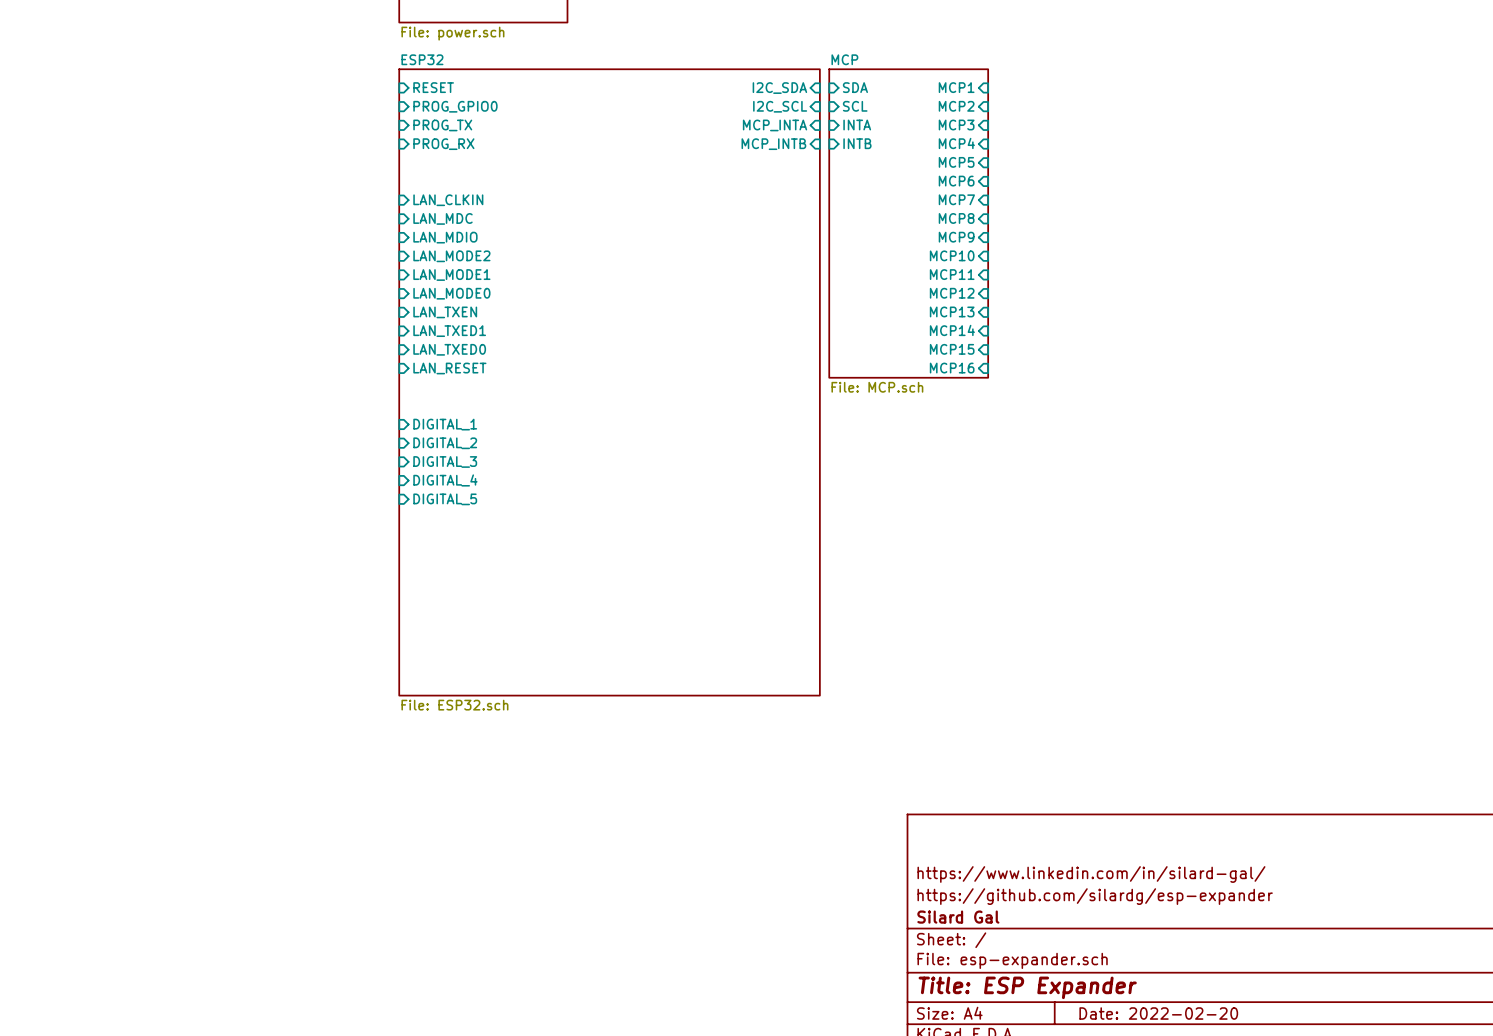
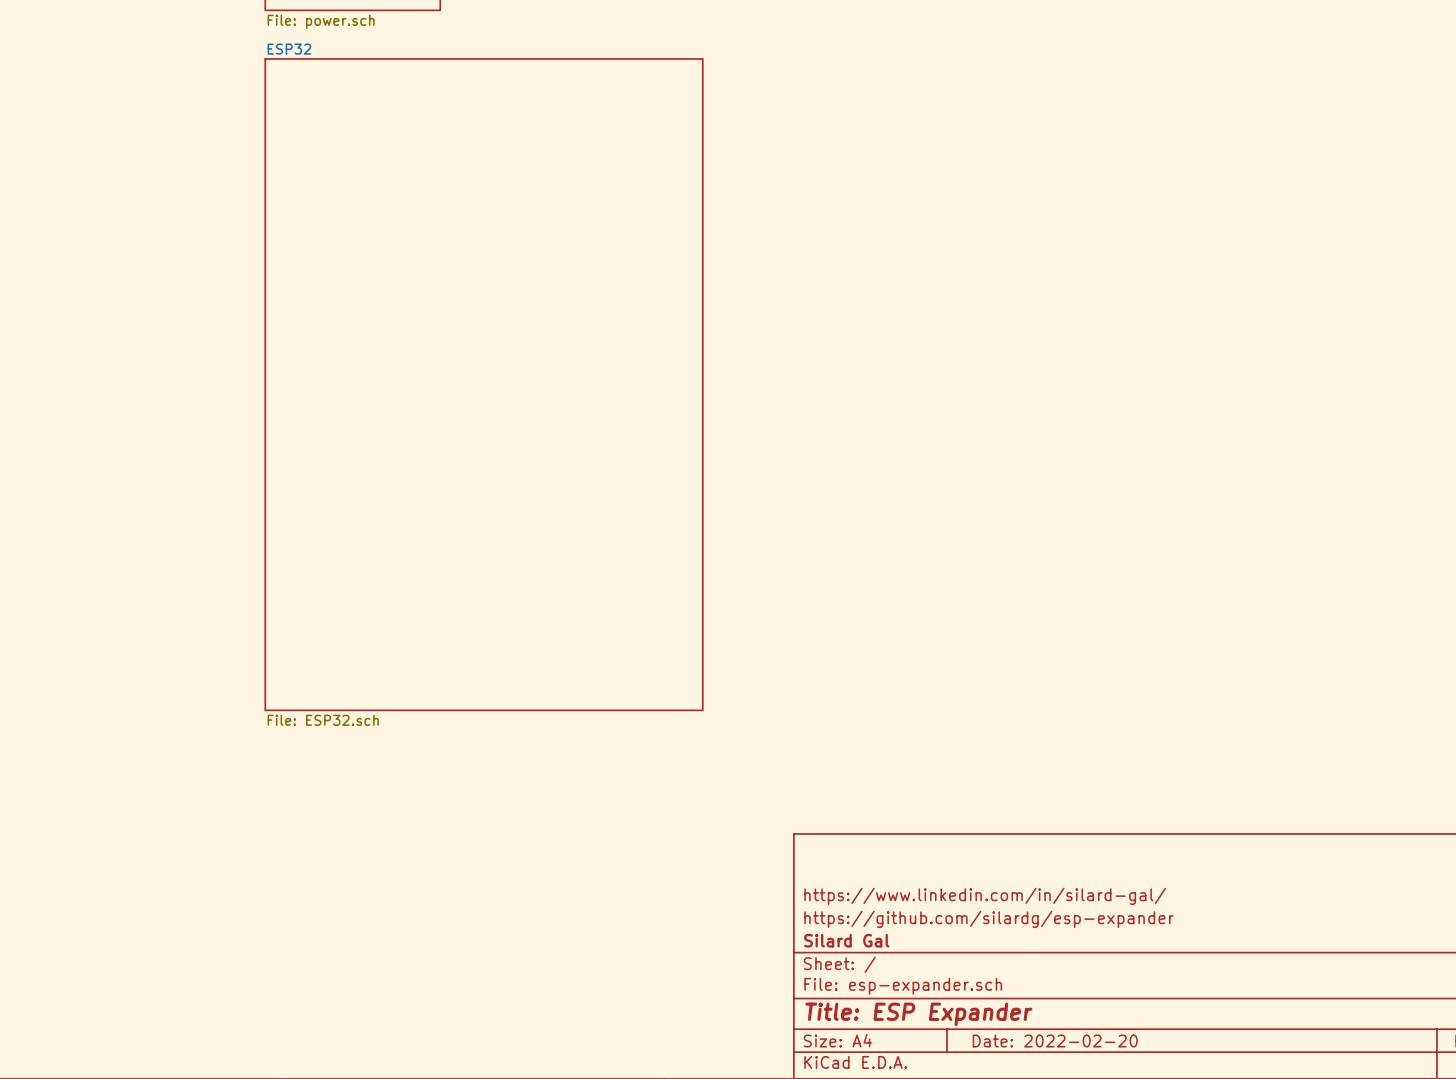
sheet pin: RESET (433, 87) -> none
sheet pin: SDA (855, 87) -> none
sheet pin: MCP1 (956, 87) -> none
sheet pin: I2C_SDA (779, 88) -> none
sheet pin: PROG_GPIO0 (455, 106) -> none
sheet pin: I2C_SCL (780, 106) -> none
sheet pin: SCL (855, 106) -> none
sheet pin: MCP2 (956, 106) -> none
sheet pin: PROG_TX (442, 125) -> none
sheet pin: MCP_INTA (775, 125) -> none
sheet pin: INTA (857, 125) -> none
sheet pin: MCP3 (956, 125) -> none
sheet pin: INTB (857, 143) -> none
sheet pin: MCP4 (956, 143) -> none
sheet pin: PROG_RX (443, 144) -> none
sheet pin: MCP_INTB (773, 144) -> none
sheet pin: MCP5 (956, 162) -> none
sheet pin: MCP6 (956, 181) -> none
sheet pin: MCP7 (956, 199) -> none
sheet pin: LAN_CLKIN (448, 200) -> none
sheet pin: LAN_MDC (442, 218) -> none
sheet pin: MCP8 (956, 218) -> none
sheet MCP: File: MCP.sch (908, 223) -> none
sheet pin: LAN_MDIO (445, 237) -> none
sheet pin: MCP9 (956, 237) -> none
sheet pin: MCP10 (952, 255) -> none
sheet pin: LAN_MODE2 (451, 256) -> none
sheet pin: MCP11 (952, 274) -> none
sheet pin: LAN_MODE1 (451, 275) -> none
sheet pin: LAN_MODE0 (451, 293) -> none
sheet pin: MCP12 (952, 293) -> none
sheet pin: MCP13 (952, 311) -> none
sheet pin: LAN_TXEN (445, 312) -> none
sheet pin: MCP14 (952, 330) -> none
sheet pin: LAN_TXED1 (449, 331) -> none
sheet pin: LAN_TXED0 (449, 349) -> none
sheet pin: MCP15 (952, 349) -> none
sheet pin: LAN_RESET (449, 368) -> none
sheet pin: MCP16 (952, 368) -> none
sheet pin: DIGITAL_1 (445, 424) -> none
sheet pin: DIGITAL_2 (445, 443) -> none
sheet pin: DIGITAL_3 (445, 461) -> none
sheet pin: DIGITAL_4 (445, 480) -> none
sheet pin: DIGITAL_5 (445, 499) -> none

